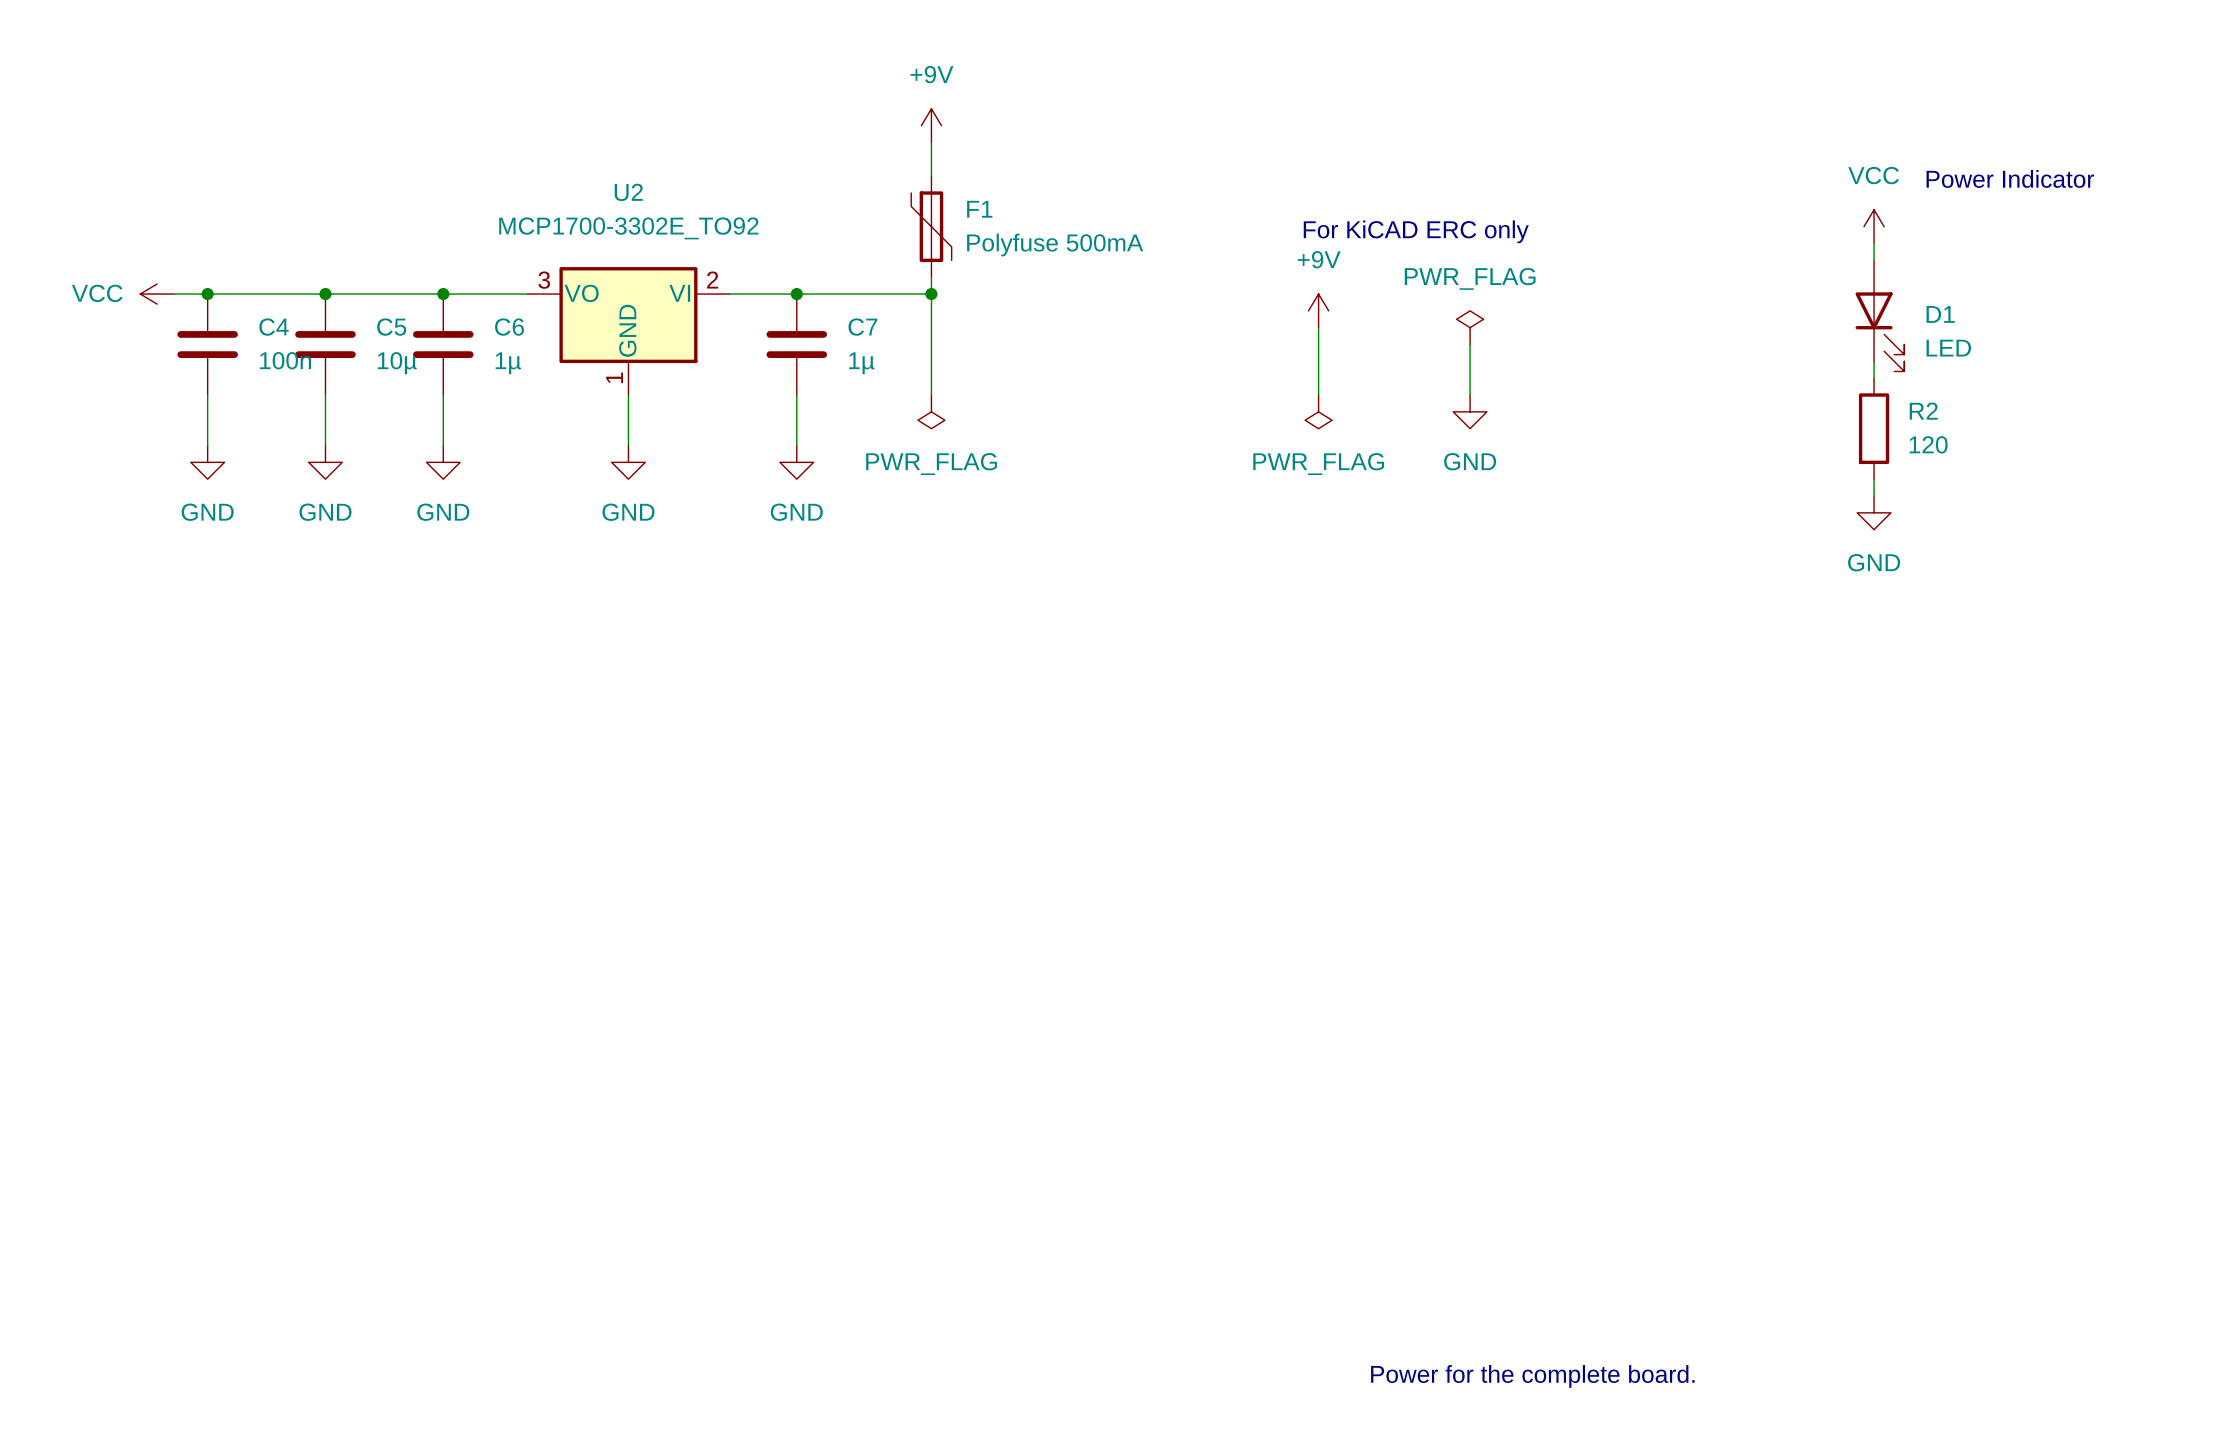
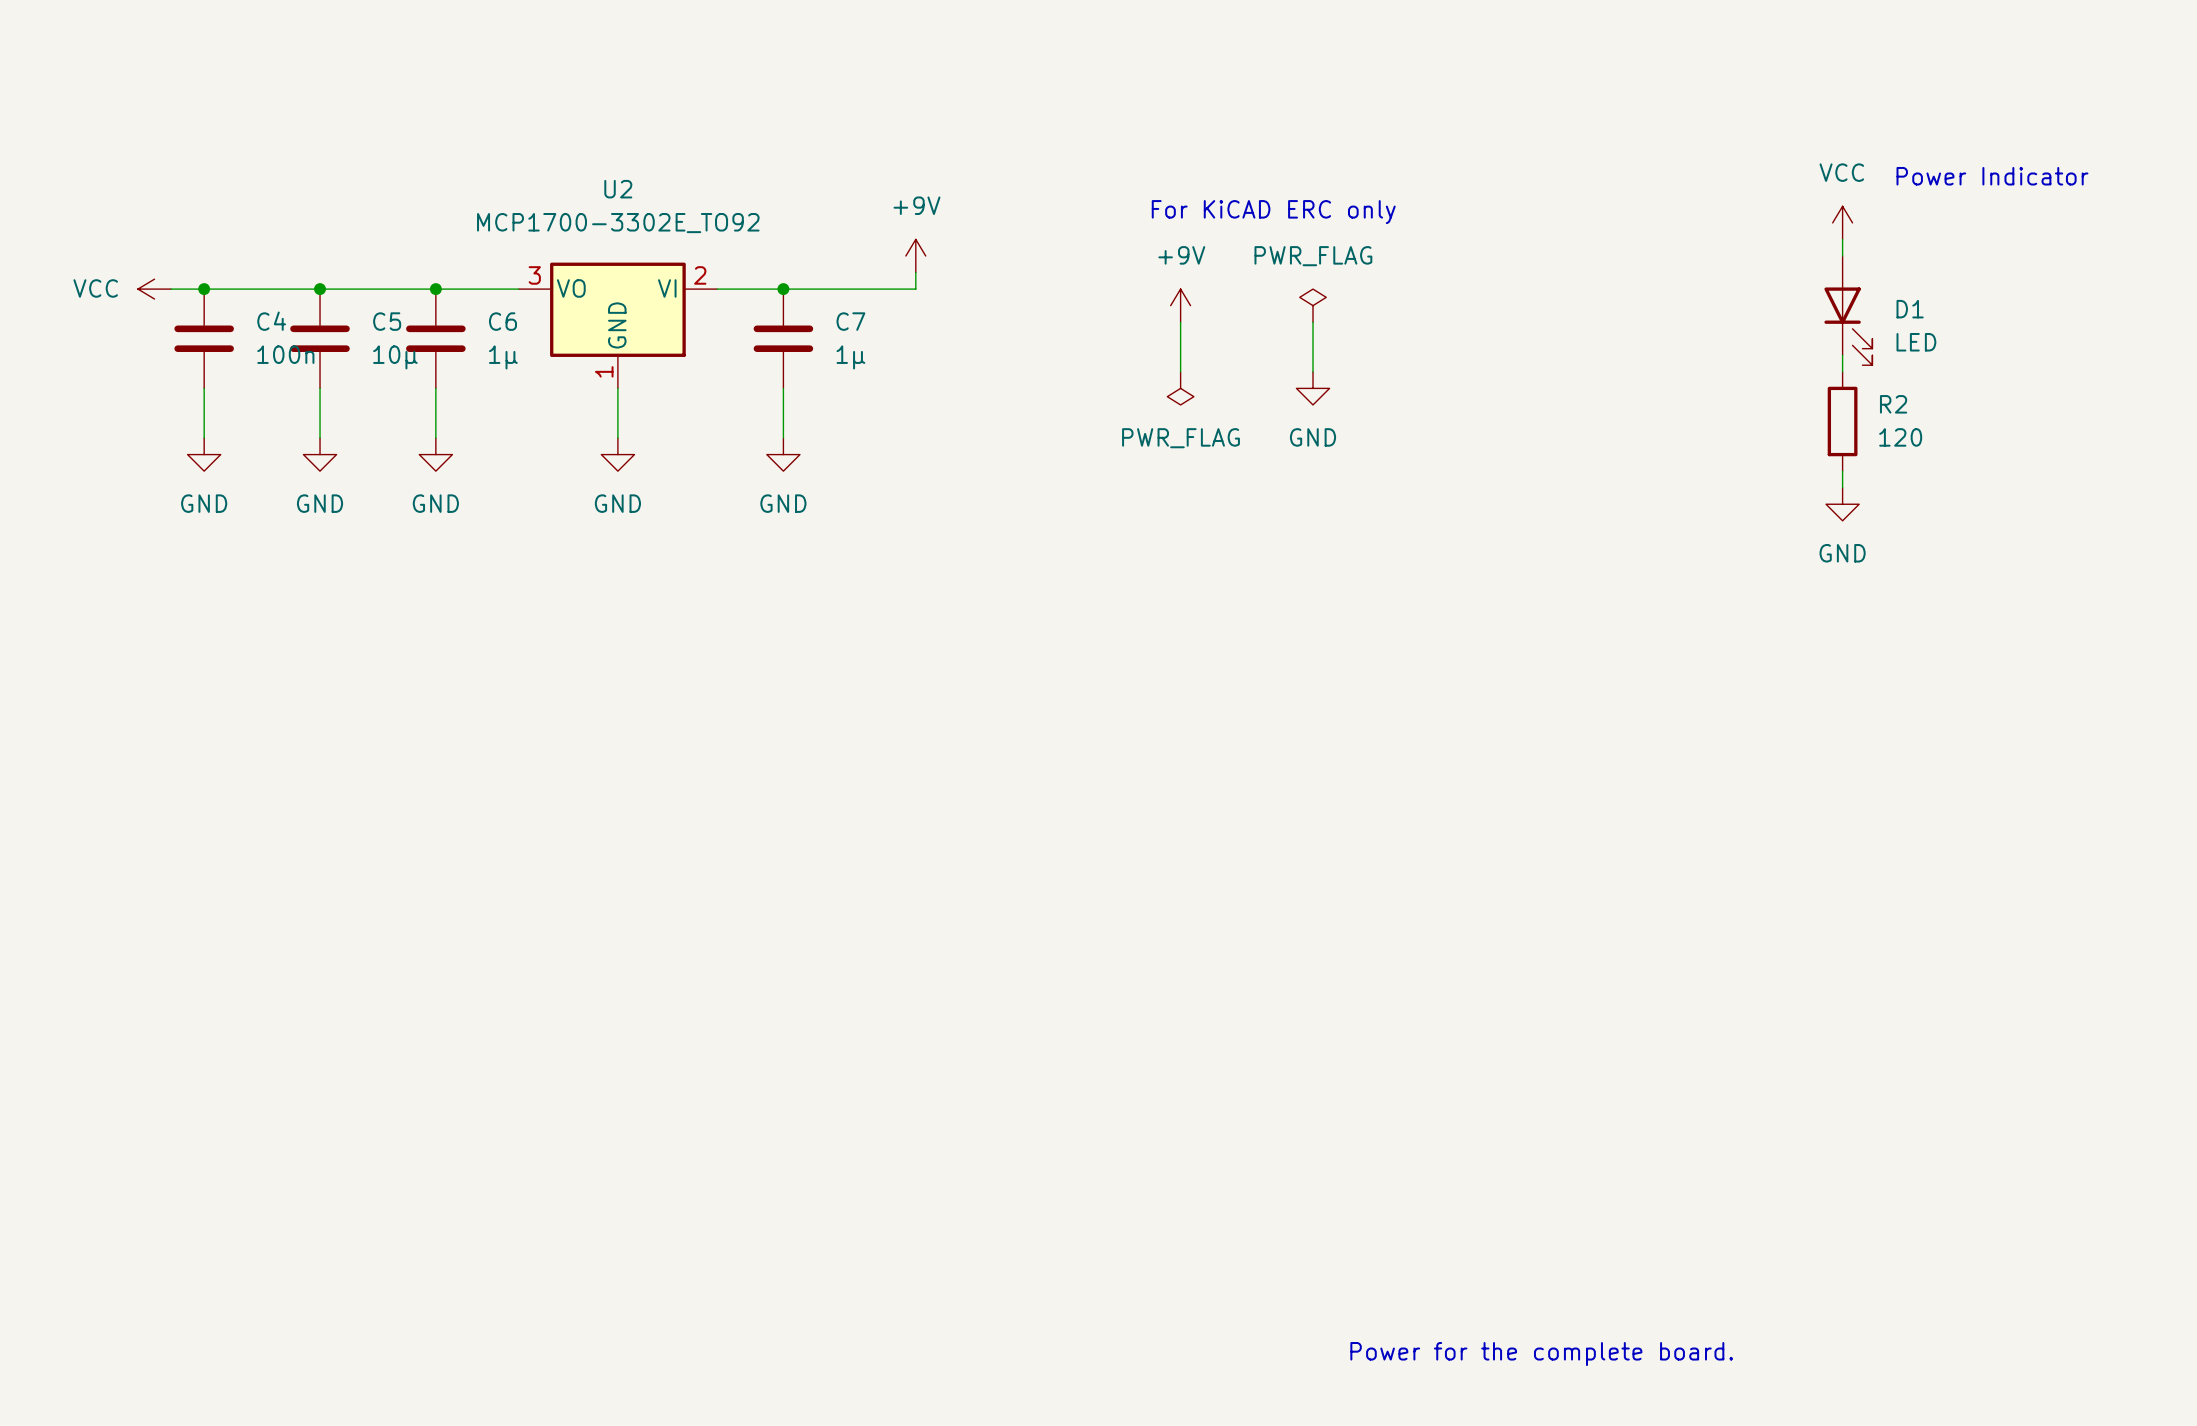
power symbol position: +9V (931, 125) -> +9V (915, 255)
wire: (931, 142) (931, 176) -> none
F1: Polyfuse 500mA (931, 226) -> none
text position: For KiCAD ERC only (1416, 231) -> For KiCAD ERC only (1273, 212)
wire: (931, 294) (931, 395) -> none
junction: (931, 294) -> none
power symbol position: +9V (1318, 310) -> +9V (1180, 305)
power symbol: none -> PWR_FLAG (1313, 305)
wire: none -> (1180, 322) (1180, 371)
wire: (1318, 327) (1318, 395) -> none
power symbol: PWR_FLAG (1470, 327) -> none
wire: (1470, 344) (1470, 395) -> (1313, 322) (1313, 371)
power symbol: none -> PWR_FLAG (1180, 388)
power symbol: PWR_FLAG (931, 411) -> none
power symbol: PWR_FLAG (1318, 411) -> none
power symbol position: GND (1470, 411) -> GND (1313, 388)

